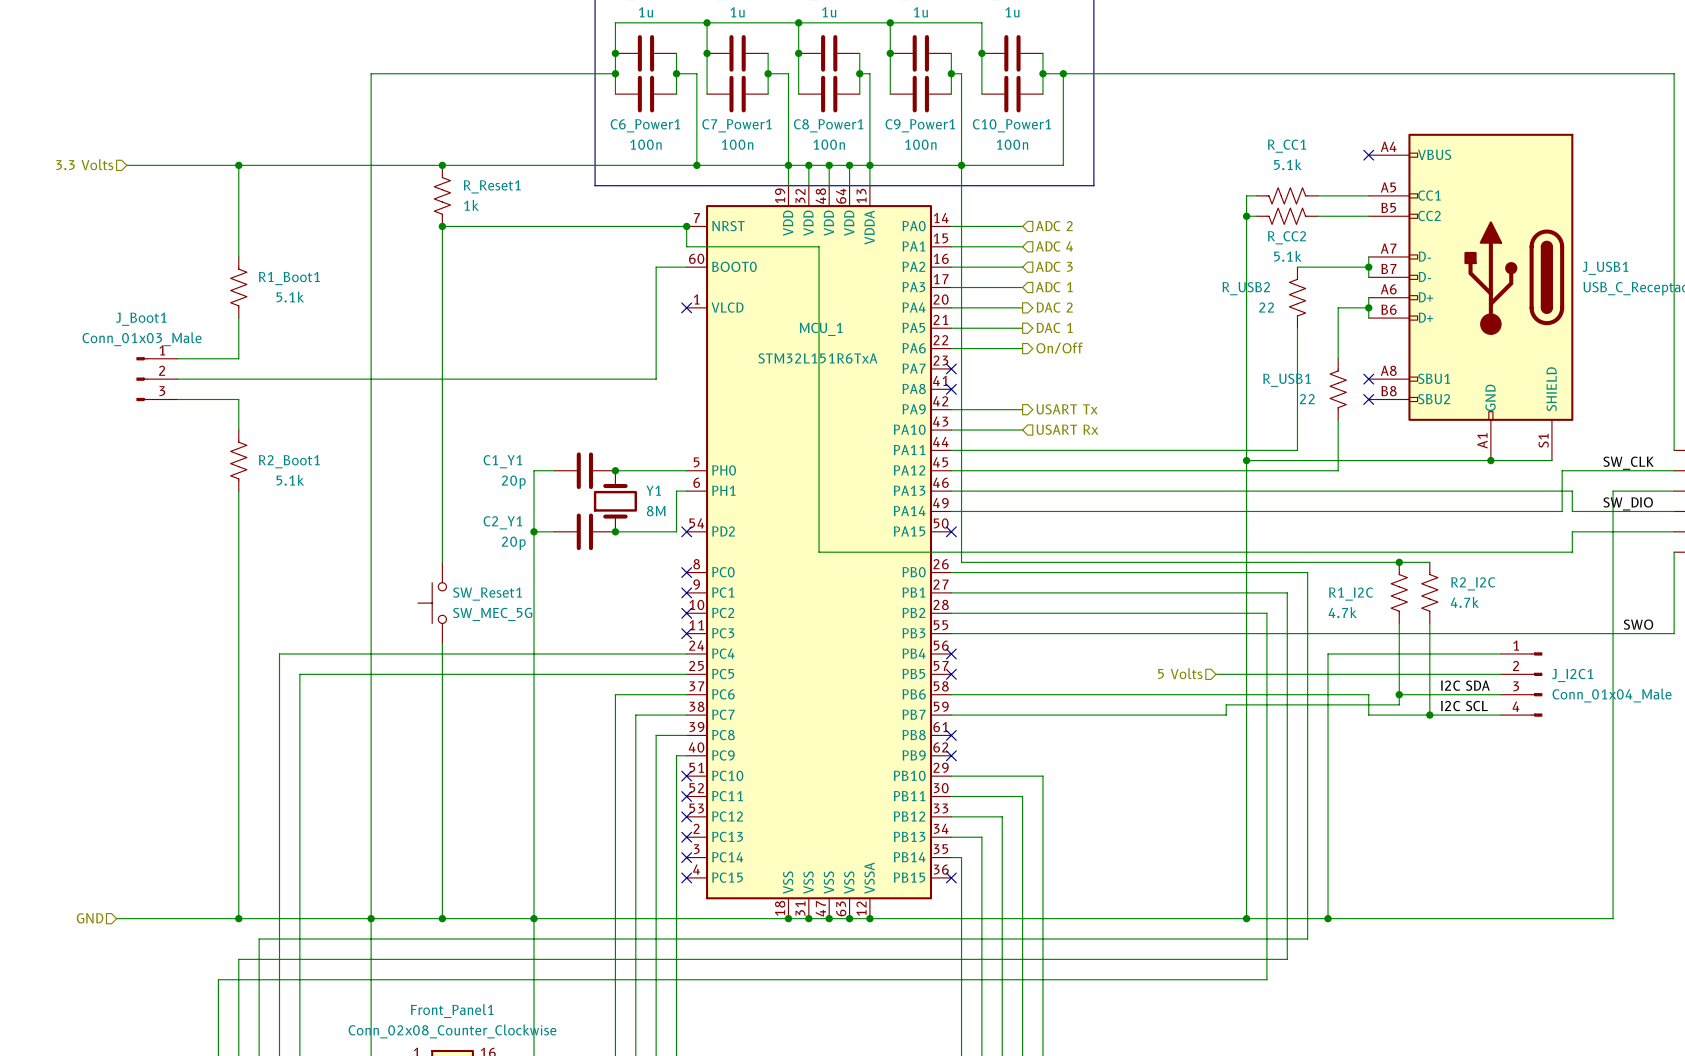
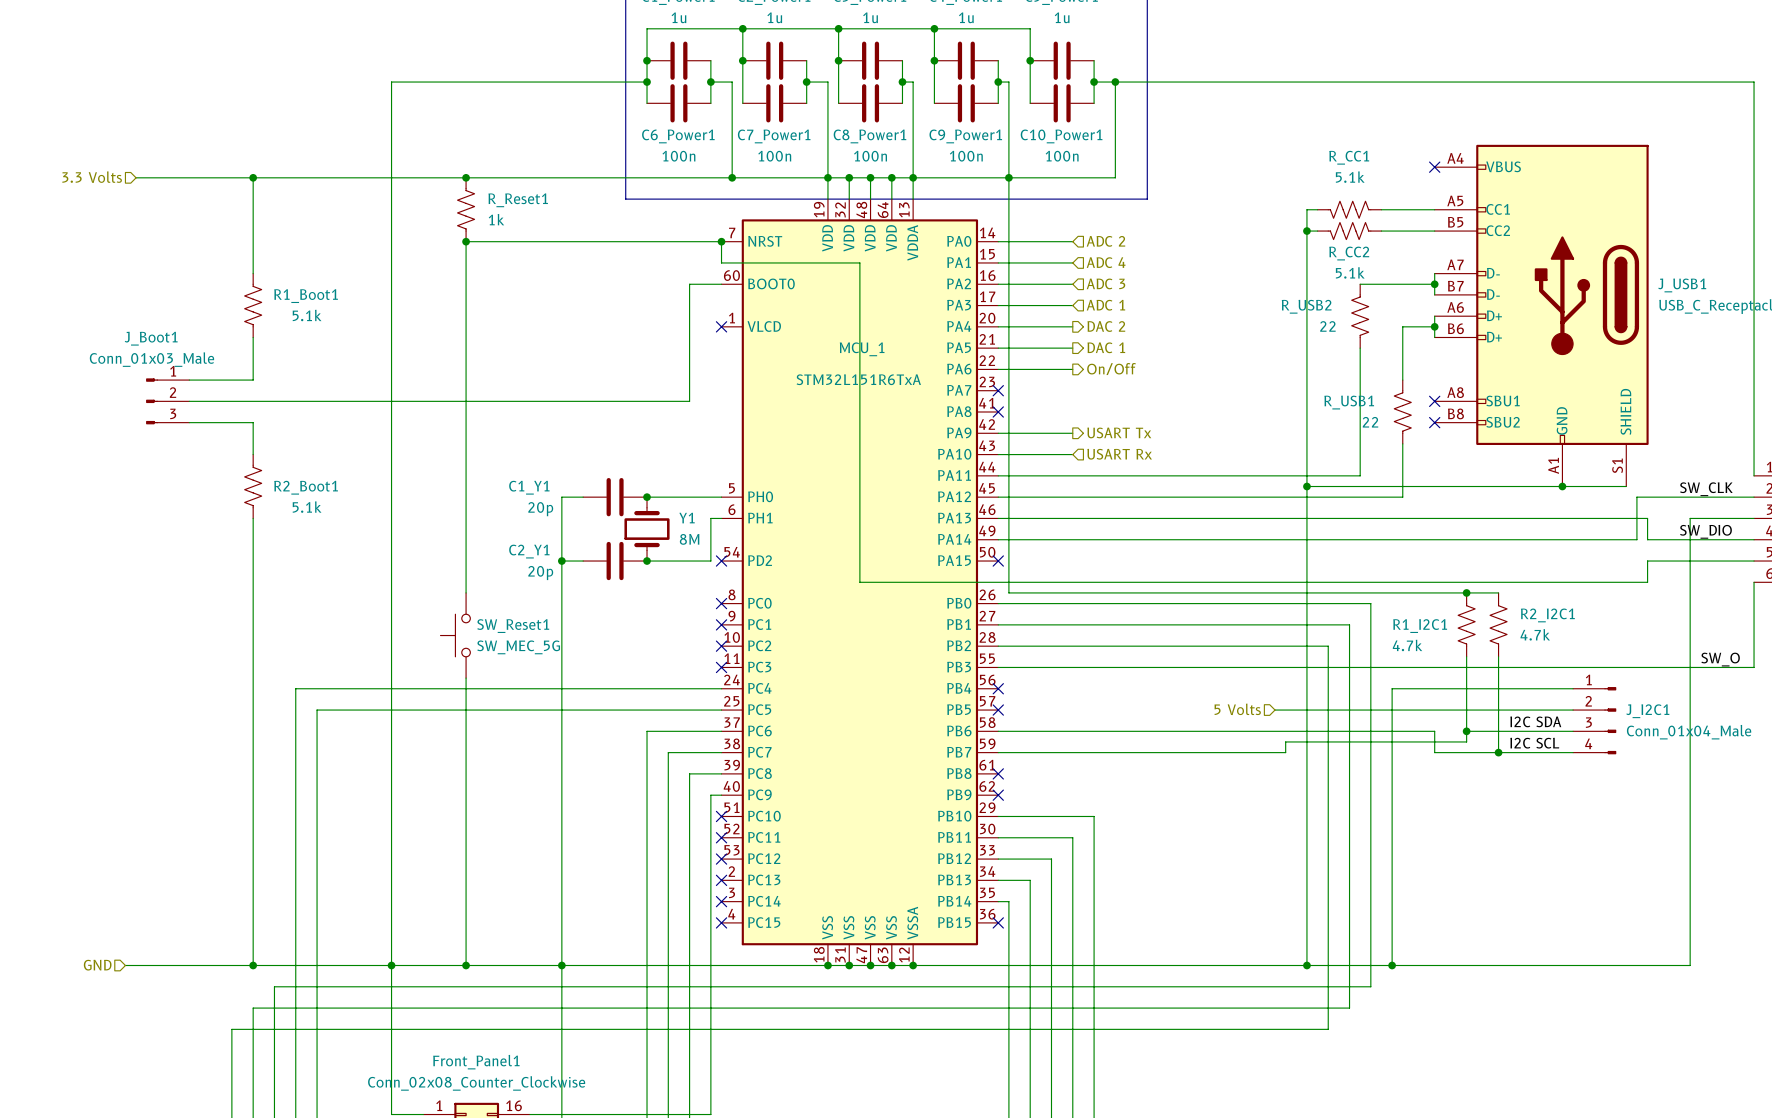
R2_I2C name: R2_I2C (1473, 583) -> R2_I2C1 (1547, 615)
R1_I2C name: R1_I2C (1351, 594) -> R1_I2C1 (1420, 626)
label: SWO (1638, 624) -> SW_O (1720, 659)

